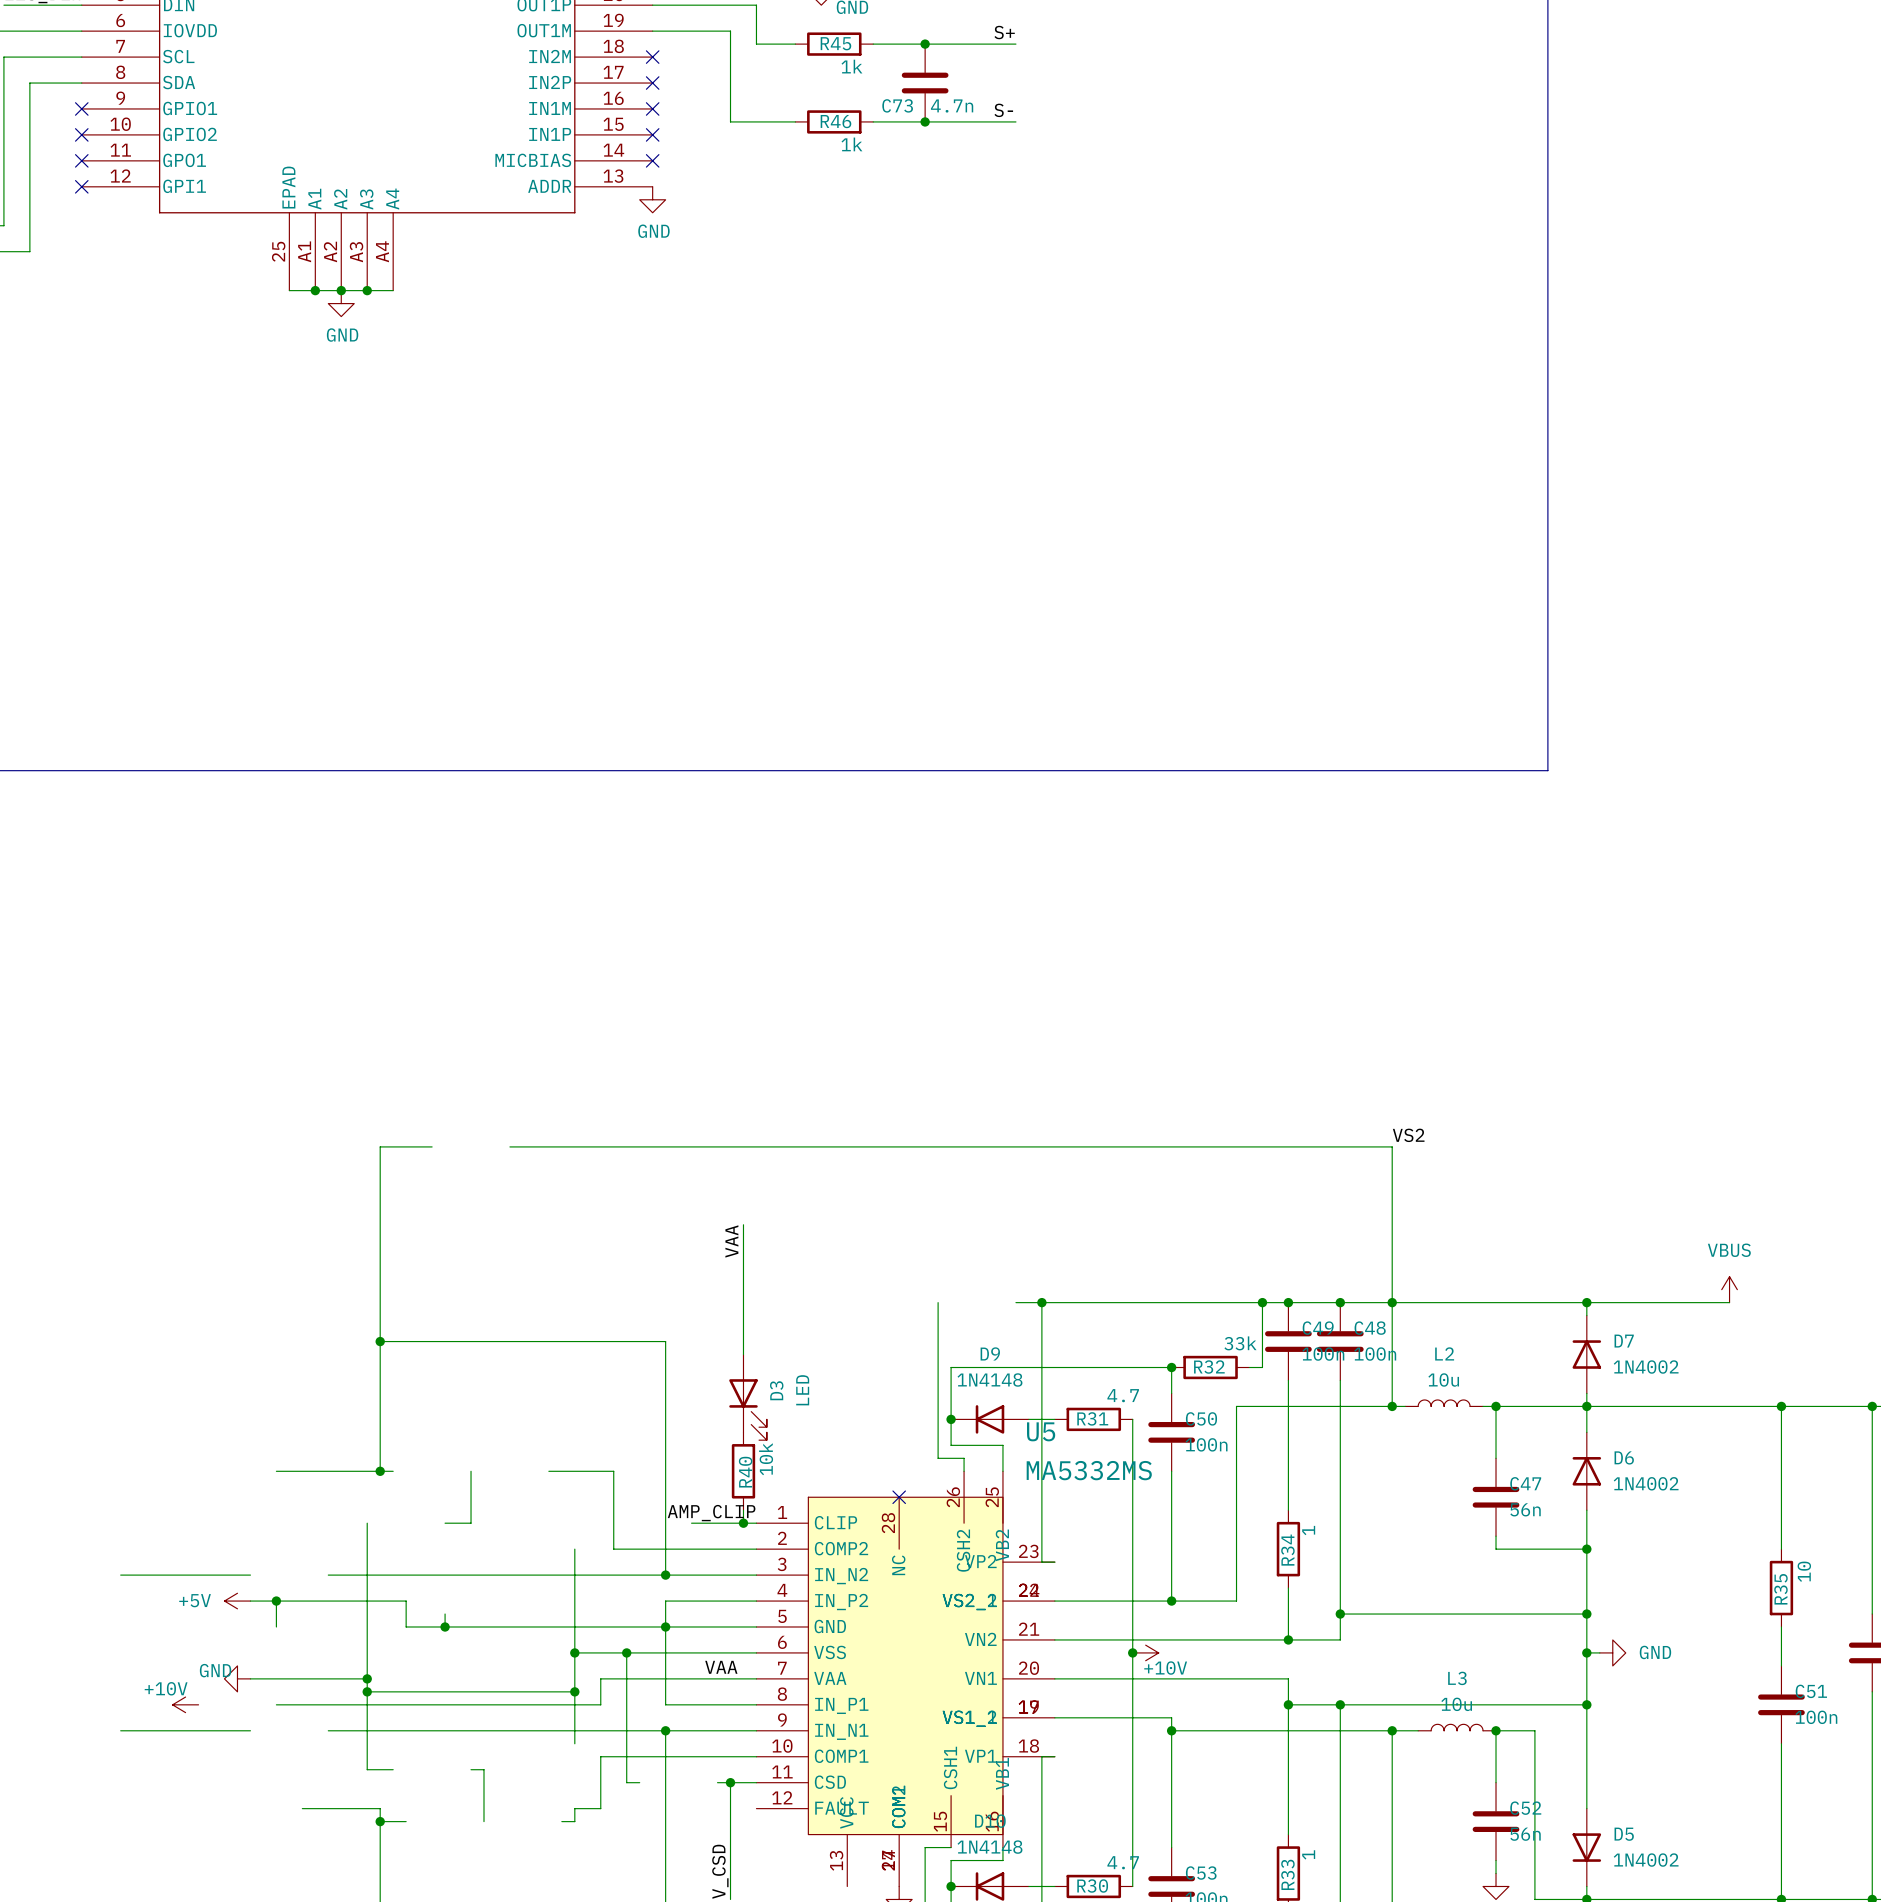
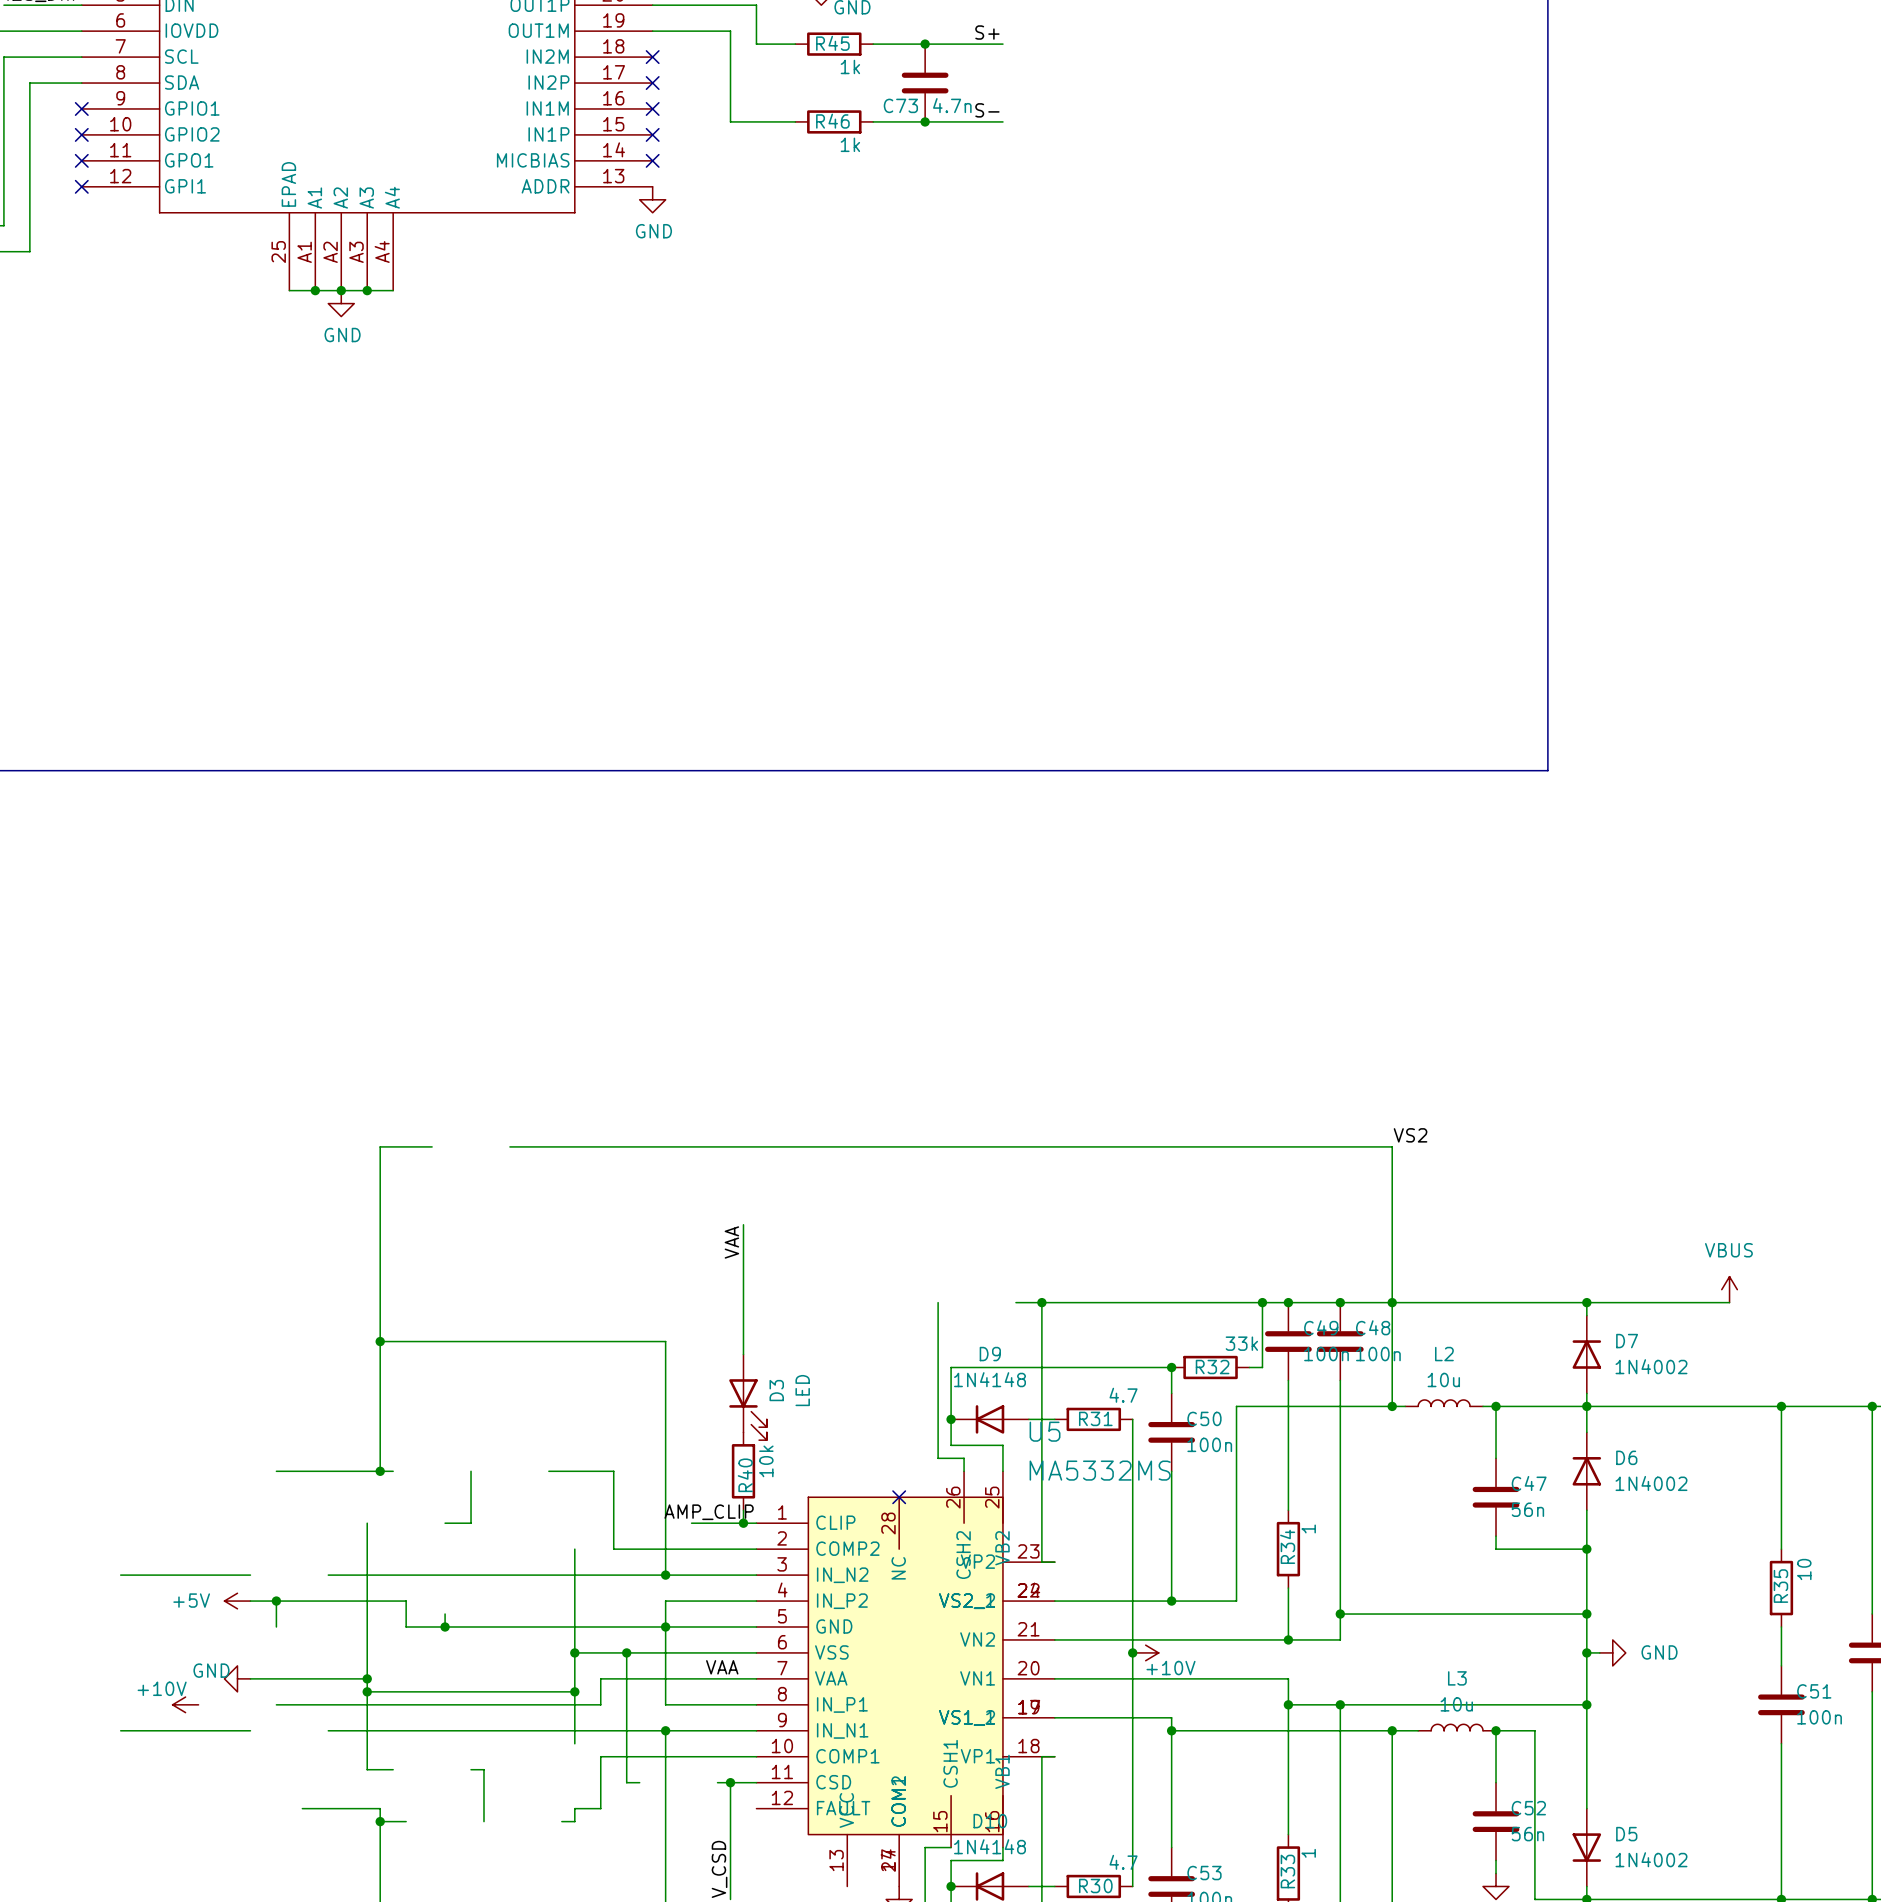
label position: S+ (1004, 32) -> S+ (987, 32)
wire: (1002, 44) (1015, 44) -> none
label position: S- (1003, 110) -> S- (987, 110)
wire: (1002, 121) (1015, 121) -> none

